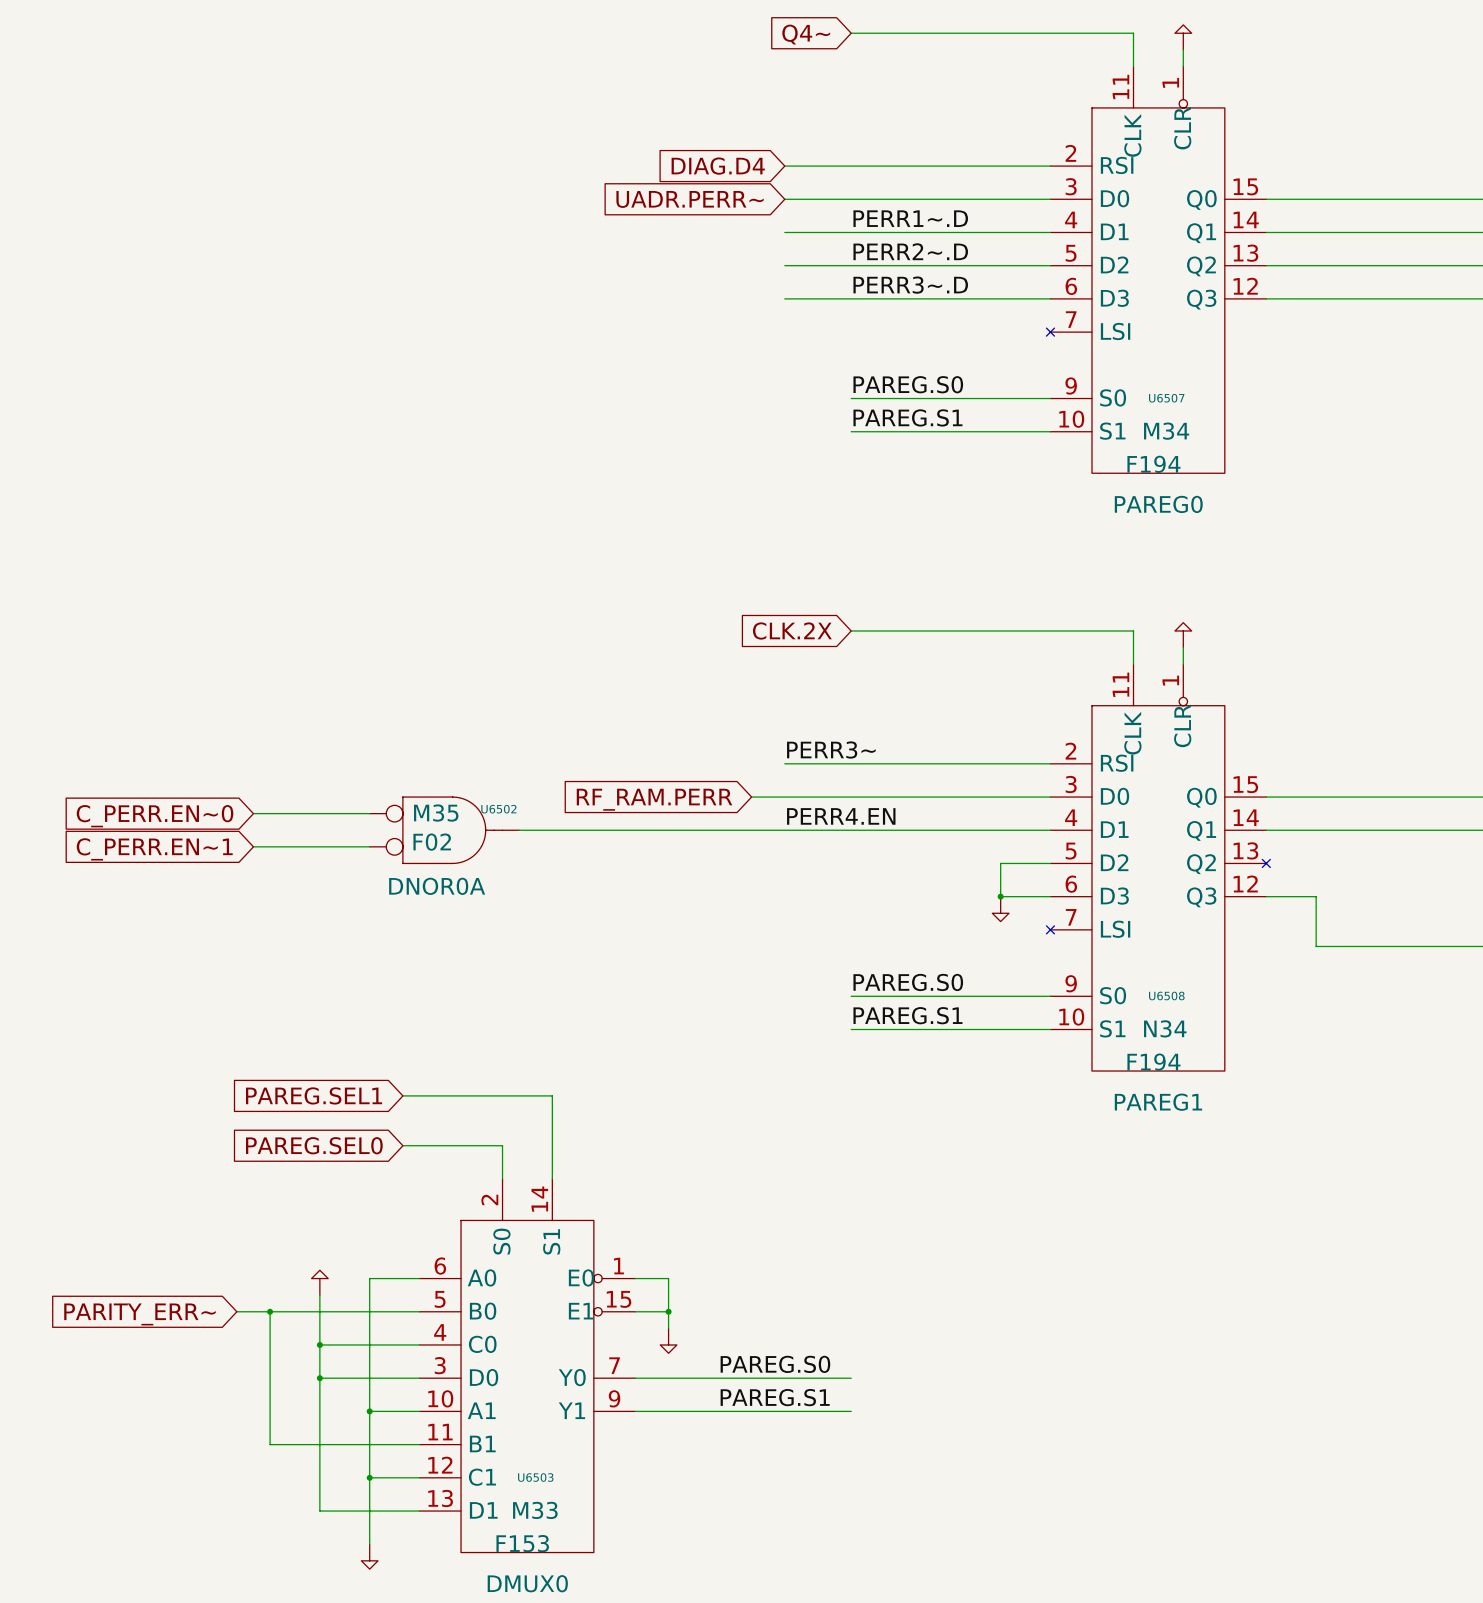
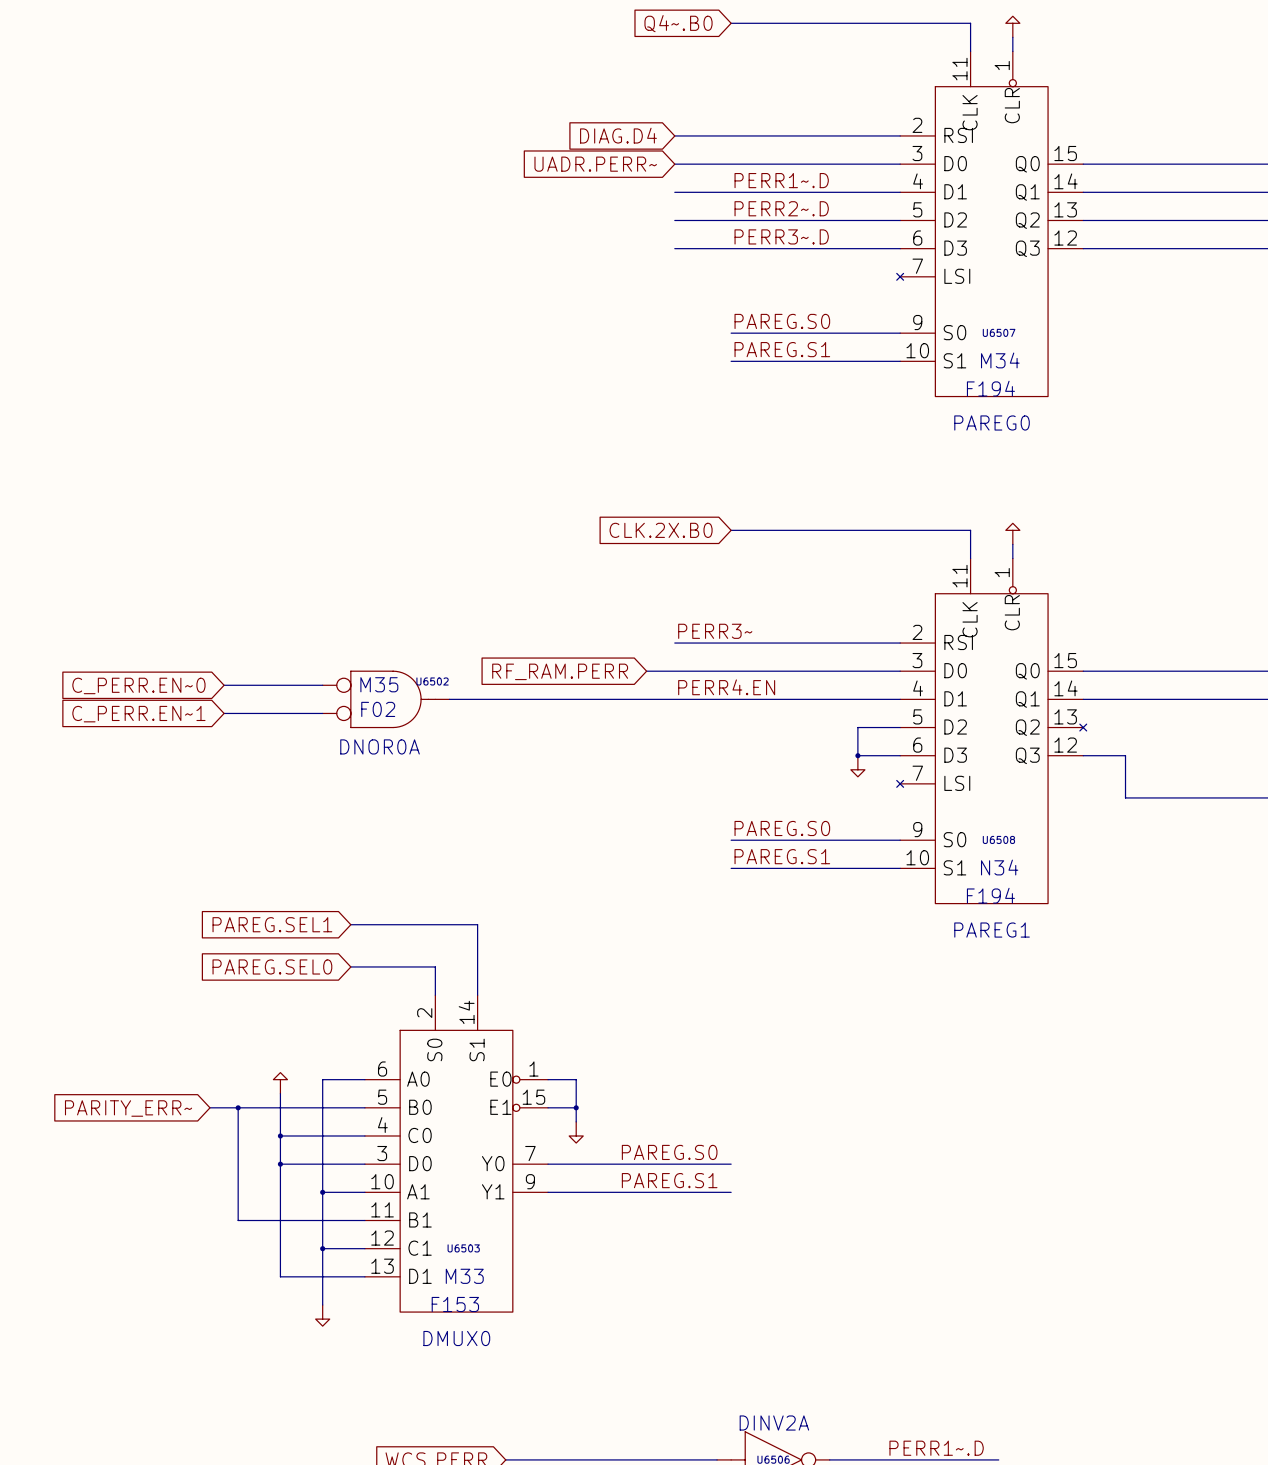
global label: Q4~ (806, 34) -> Q4~.B0 (678, 23)
global label: CLK.2X (792, 631) -> CLK.2X.B0 (661, 530)

